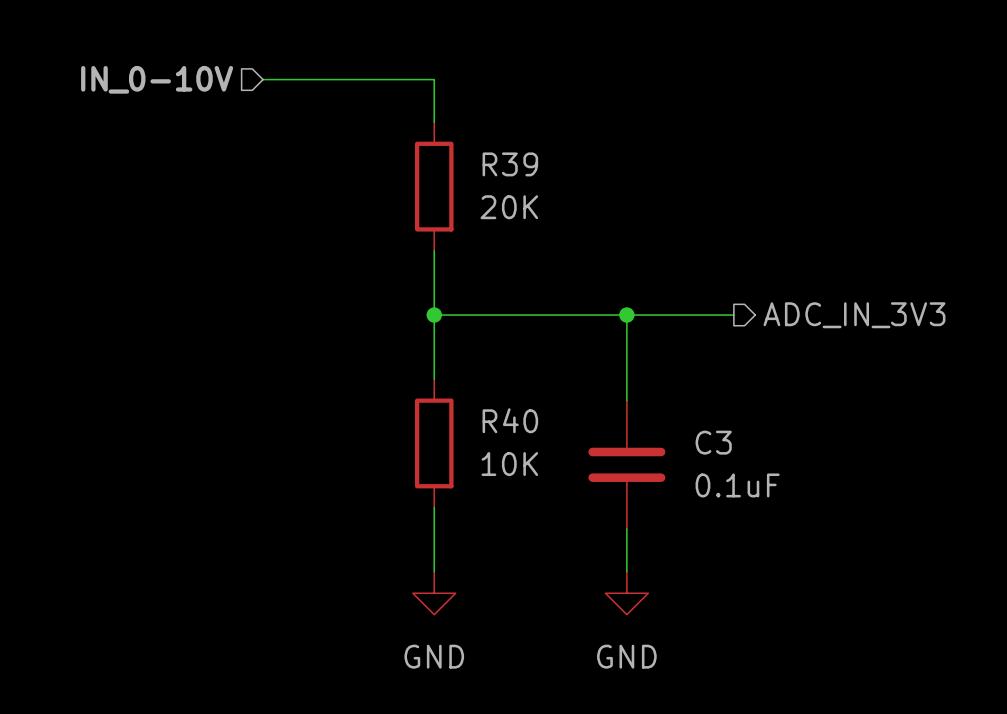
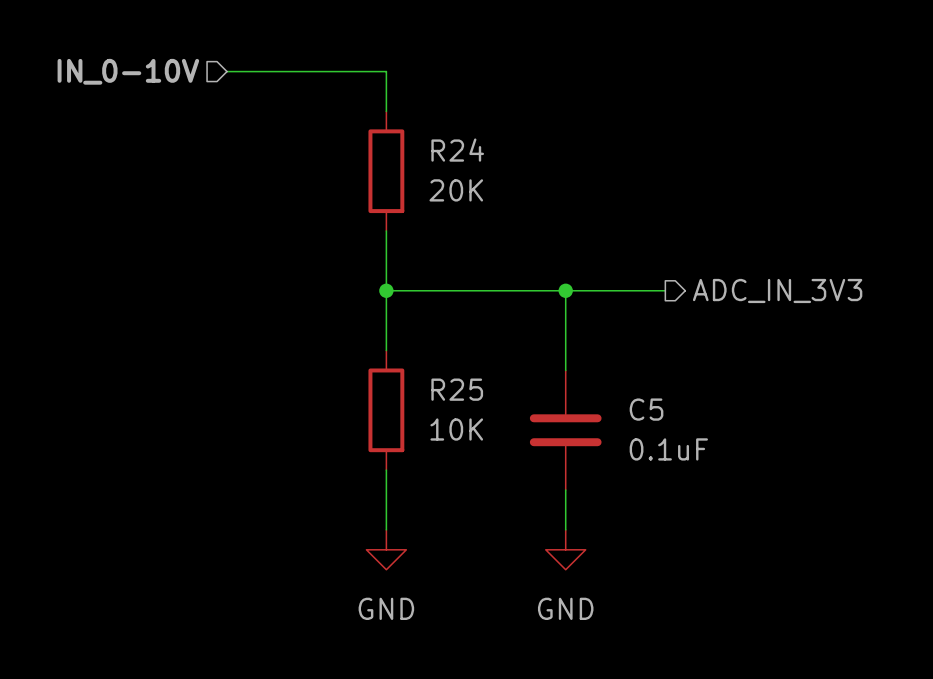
R39 name: R39 (510, 164) -> R24 (457, 150)
R40 name: R40 (510, 420) -> R25 (457, 389)
C3 name: C3 (713, 442) -> C5 (646, 409)

